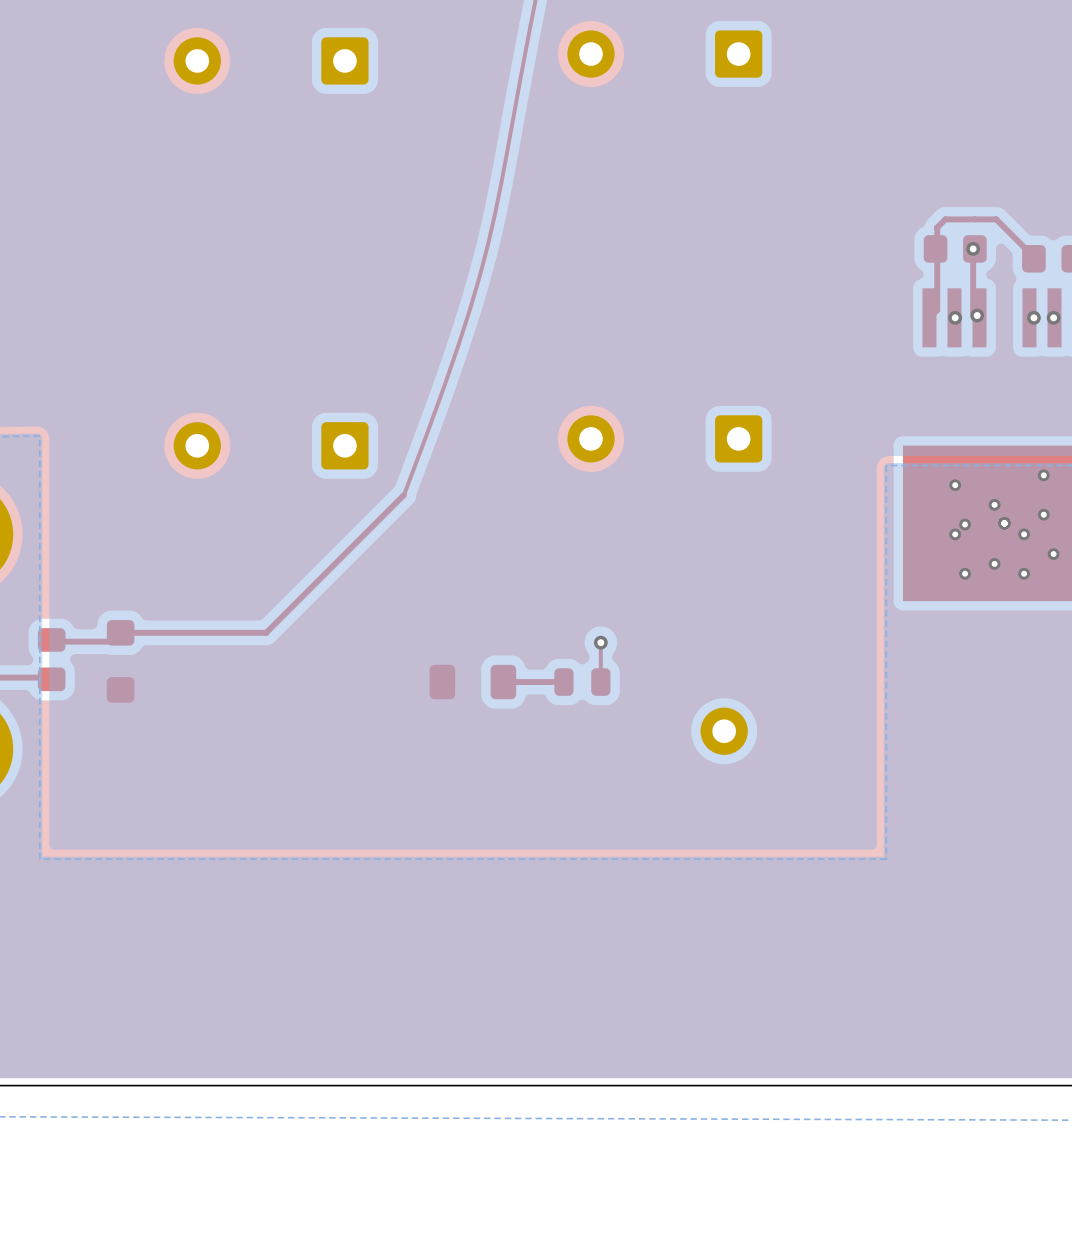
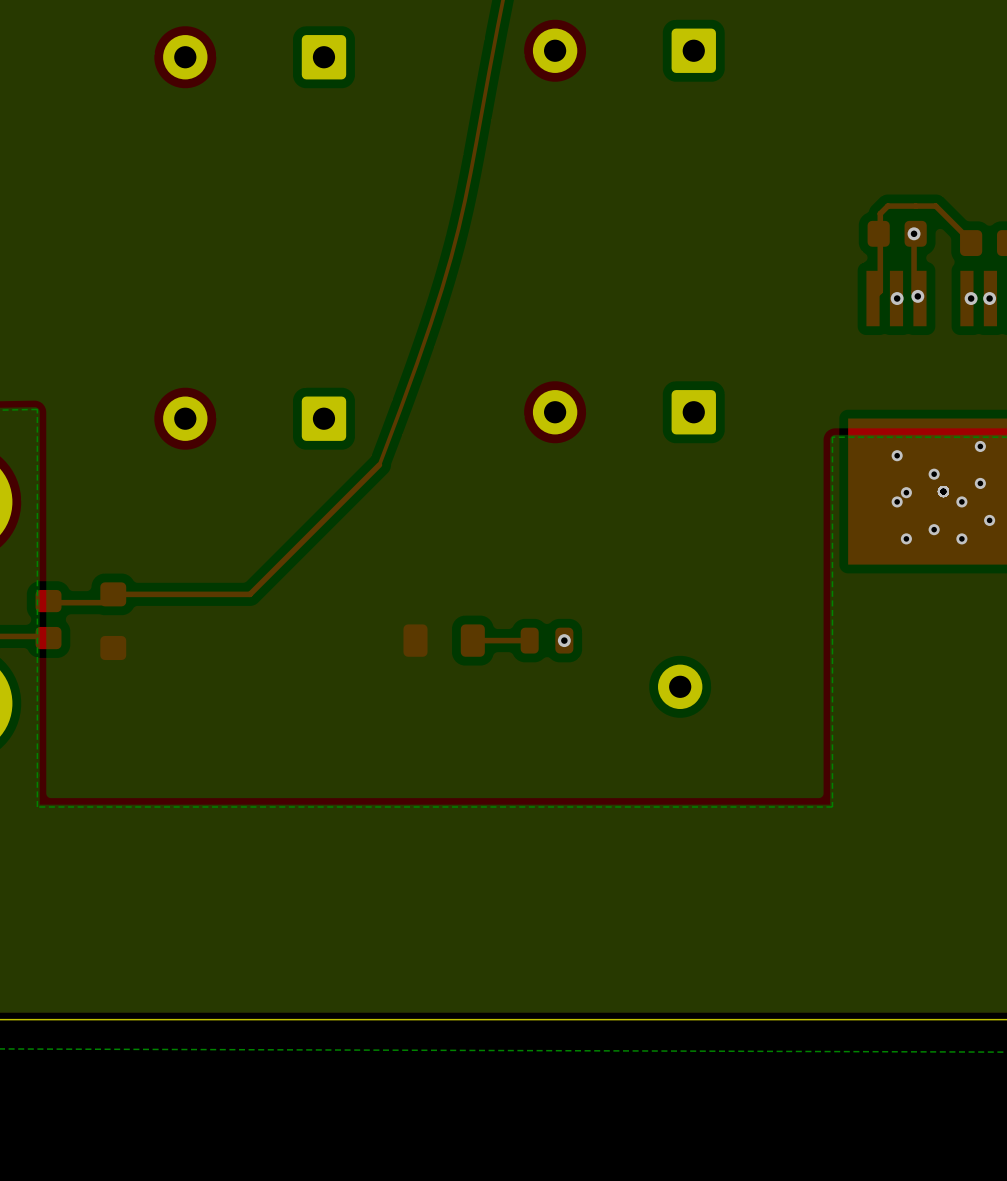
top track: (600, 642) (600, 682) -> none
via position: (600, 642) -> (564, 640)

